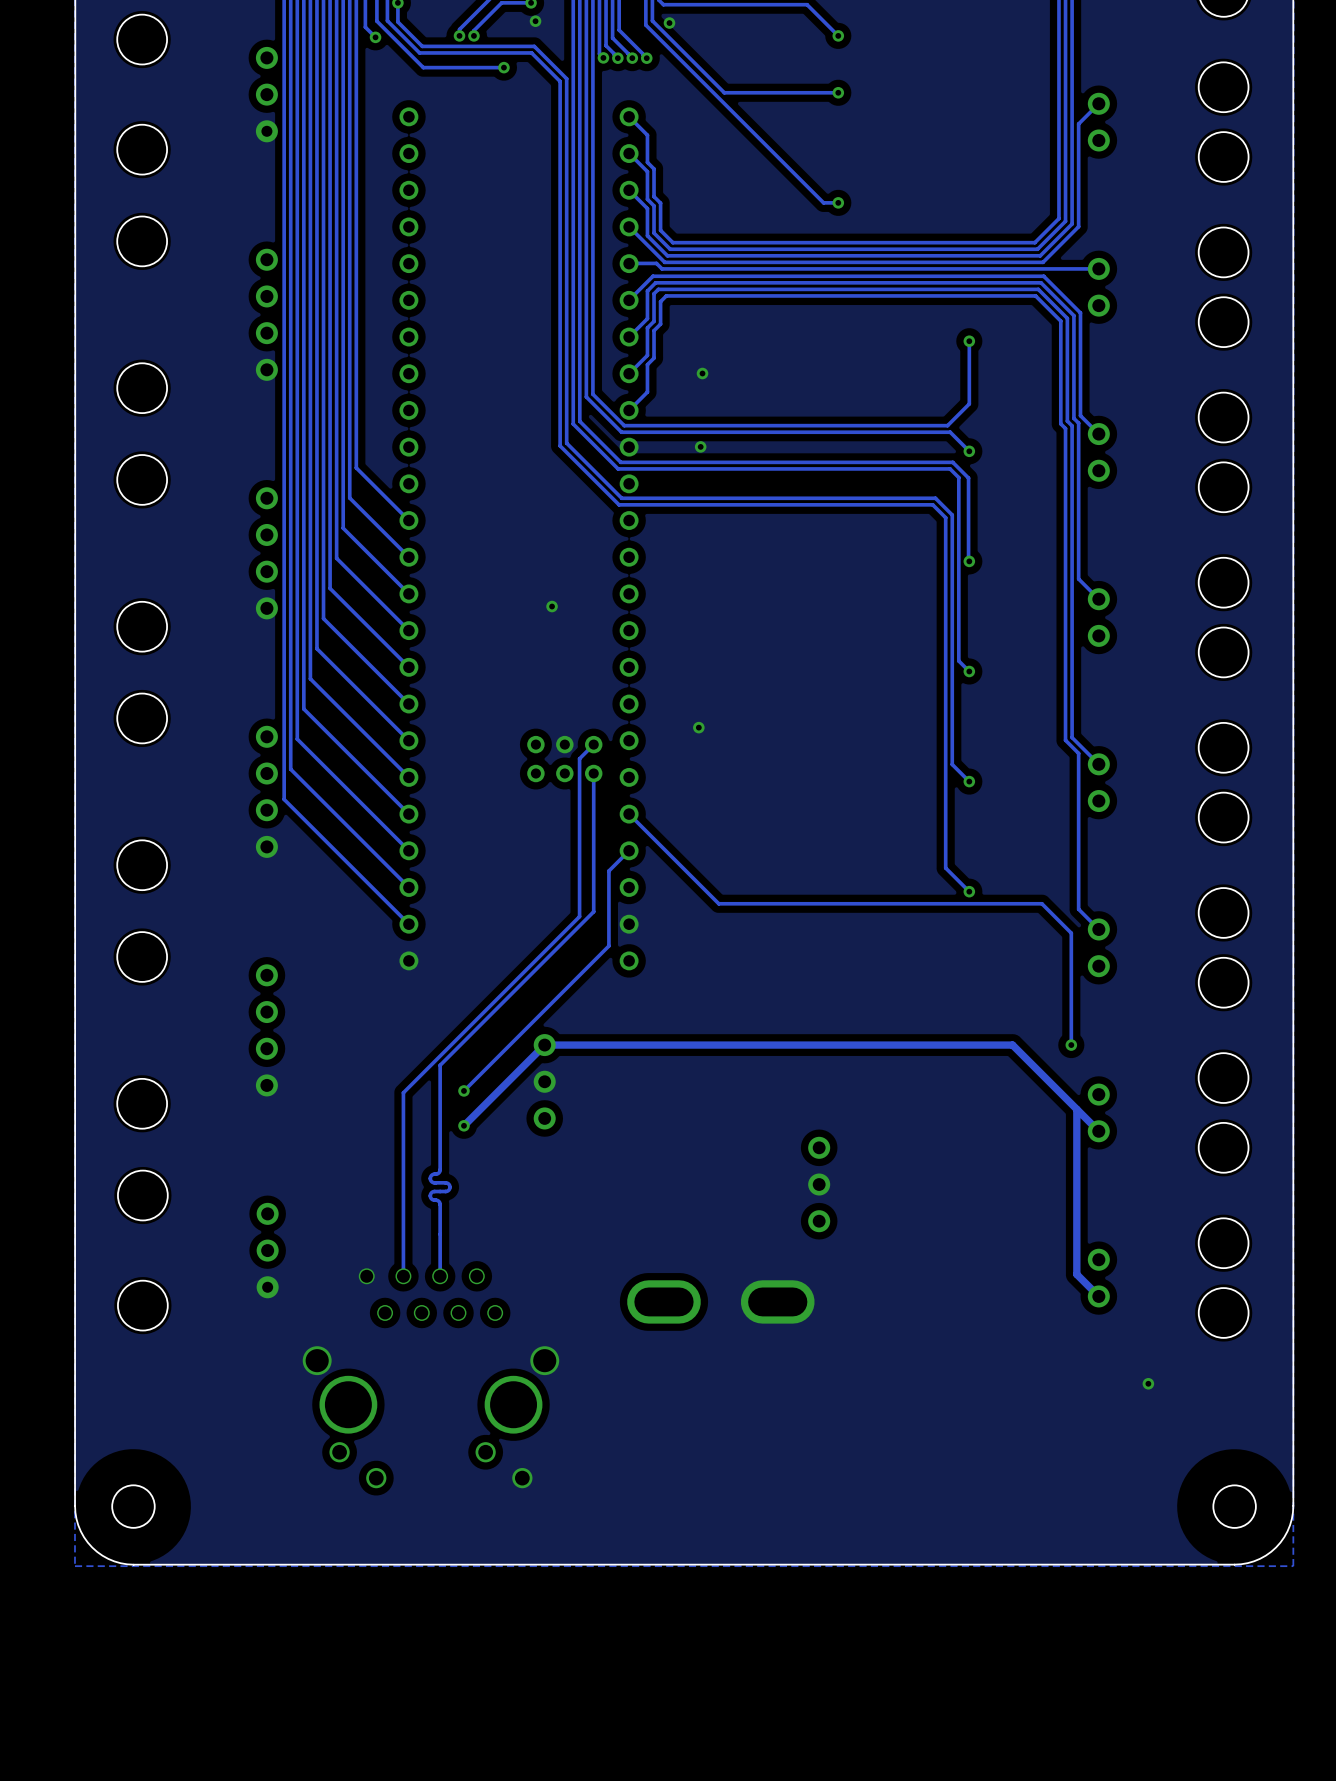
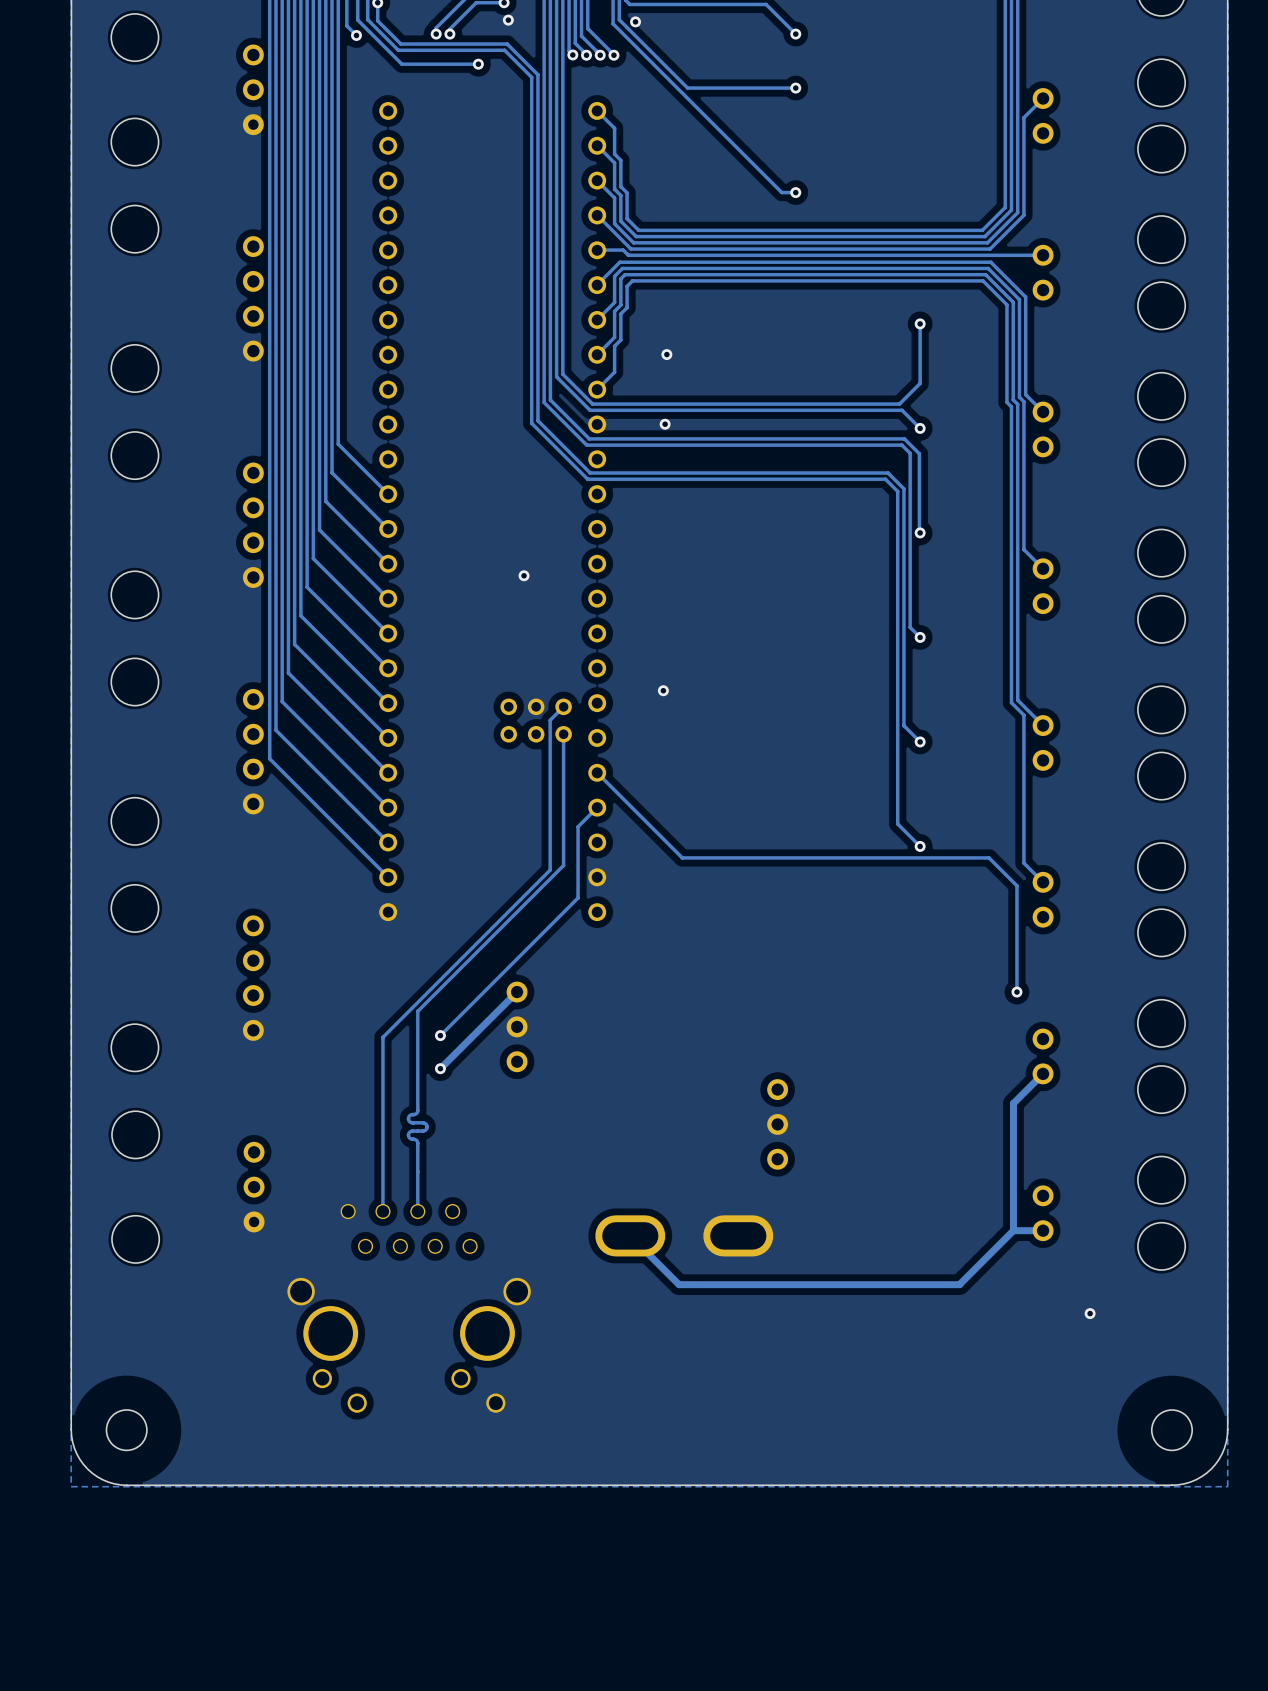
track: (544, 1045) (1012, 1045) (1098, 1131) -> (1013, 1230) (1013, 1103) (1043, 1073)
track: (1076, 1109) (1076, 1274) (1098, 1296) -> (1013, 1230) (1043, 1230)
track: none -> (1013, 1230) (959, 1284) (679, 1284) (630, 1235)

